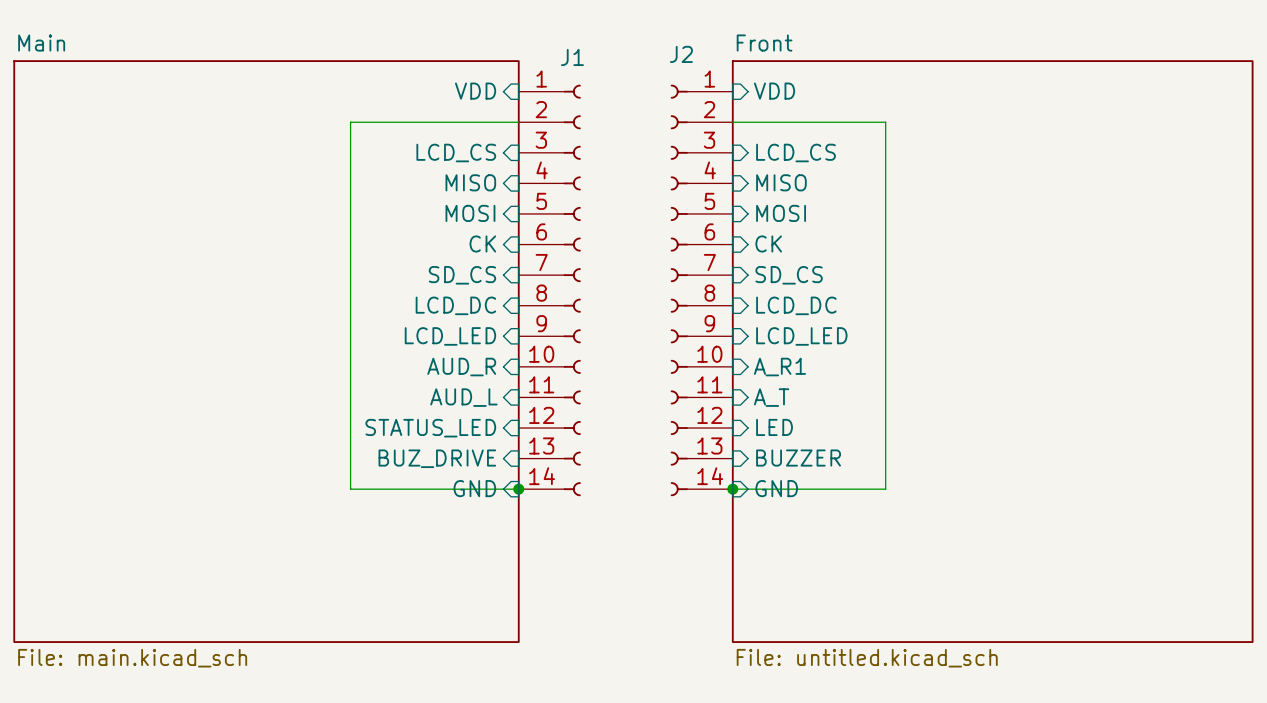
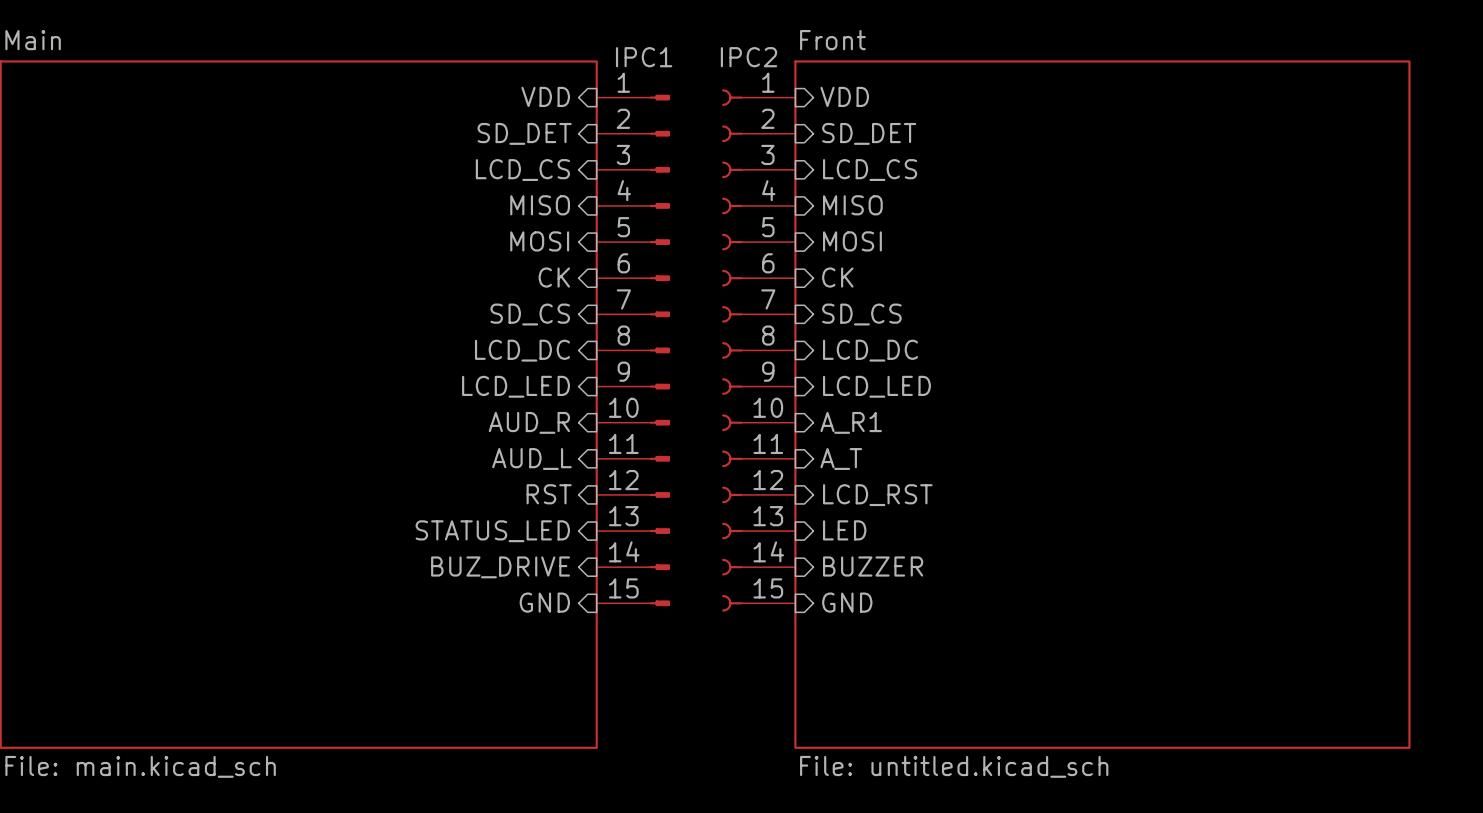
sheet pin position: VDD (774, 91) -> VDD (844, 96)
sheet pin: none -> SD_DET (524, 133)
wire: (518, 122) (350, 122) (350, 489) (518, 489) -> none
wire: (732, 122) (885, 122) (885, 489) (732, 489) -> none
sheet pin: none -> SD_DET (869, 133)
sheet pin position: LCD_CS (796, 152) -> LCD_CS (870, 170)
sheet pin position: MISO (781, 182) -> MISO (852, 205)
sheet pin position: MOSI (781, 213) -> MOSI (852, 241)
sheet pin position: CK (768, 243) -> CK (837, 277)
sheet pin position: SD_CS (789, 275) -> SD_CS (861, 314)
J1: (549, 290) -> none
J2: (701, 290) -> none
IPC1: none -> (633, 350)
IPC2: none -> (758, 350)
sheet pin position: LCD_DC (796, 305) -> LCD_DC (870, 350)
sheet pin position: LCD_LED (801, 336) -> LCD_LED (876, 386)
sheet Front position: (992, 351) -> (1102, 404)
sheet pin position: A_R1 (779, 367) -> A_R1 (851, 422)
sheet pin position: A_T (771, 397) -> A_T (841, 459)
sheet pin position: LED (774, 427) -> LED (844, 530)
sheet pin: STATUS_LED (430, 428) -> RST (549, 494)
sheet pin: none -> LCD_RST (877, 495)
sheet pin: BUZ_DRIVE (437, 458) -> STATUS_LED (492, 531)
sheet pin position: BUZZER (798, 458) -> BUZZER (873, 566)
sheet pin: GND (474, 488) -> BUZ_DRIVE (500, 567)
sheet pin position: GND (776, 488) -> GND (847, 602)
junction: (518, 489) -> none
junction: (732, 489) -> none
sheet pin: none -> GND (544, 602)

